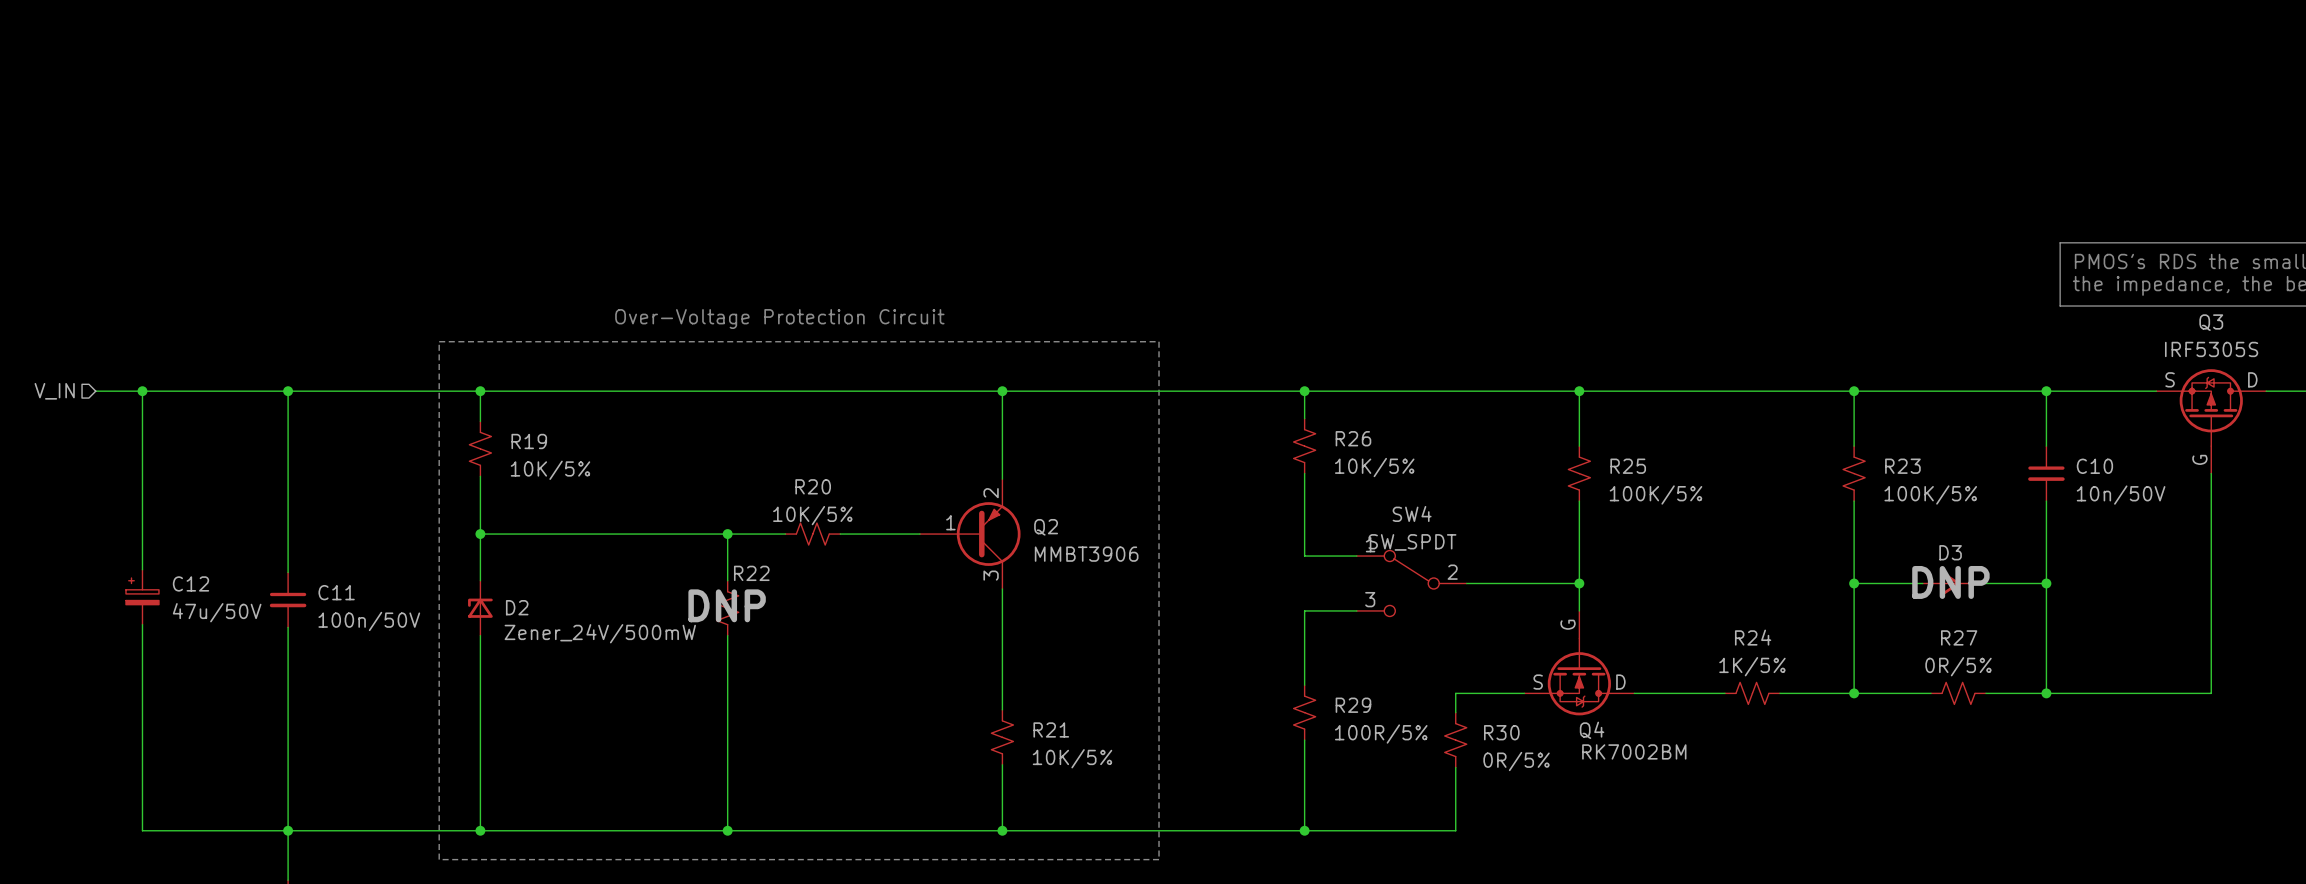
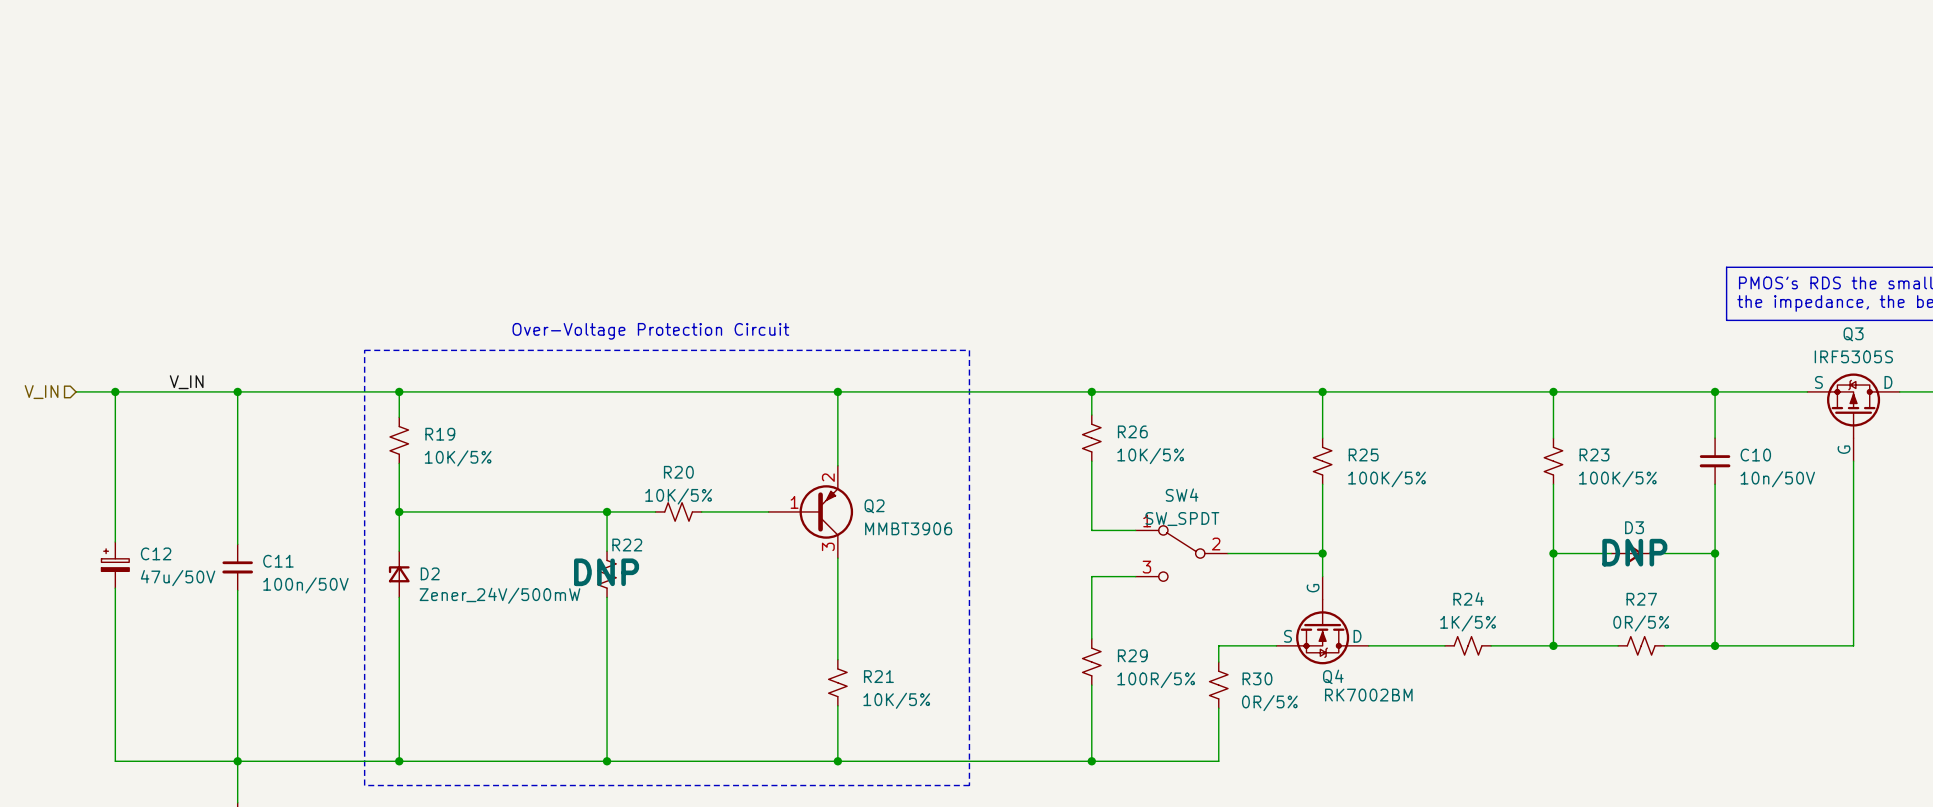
label: none -> V_IN (186, 382)

